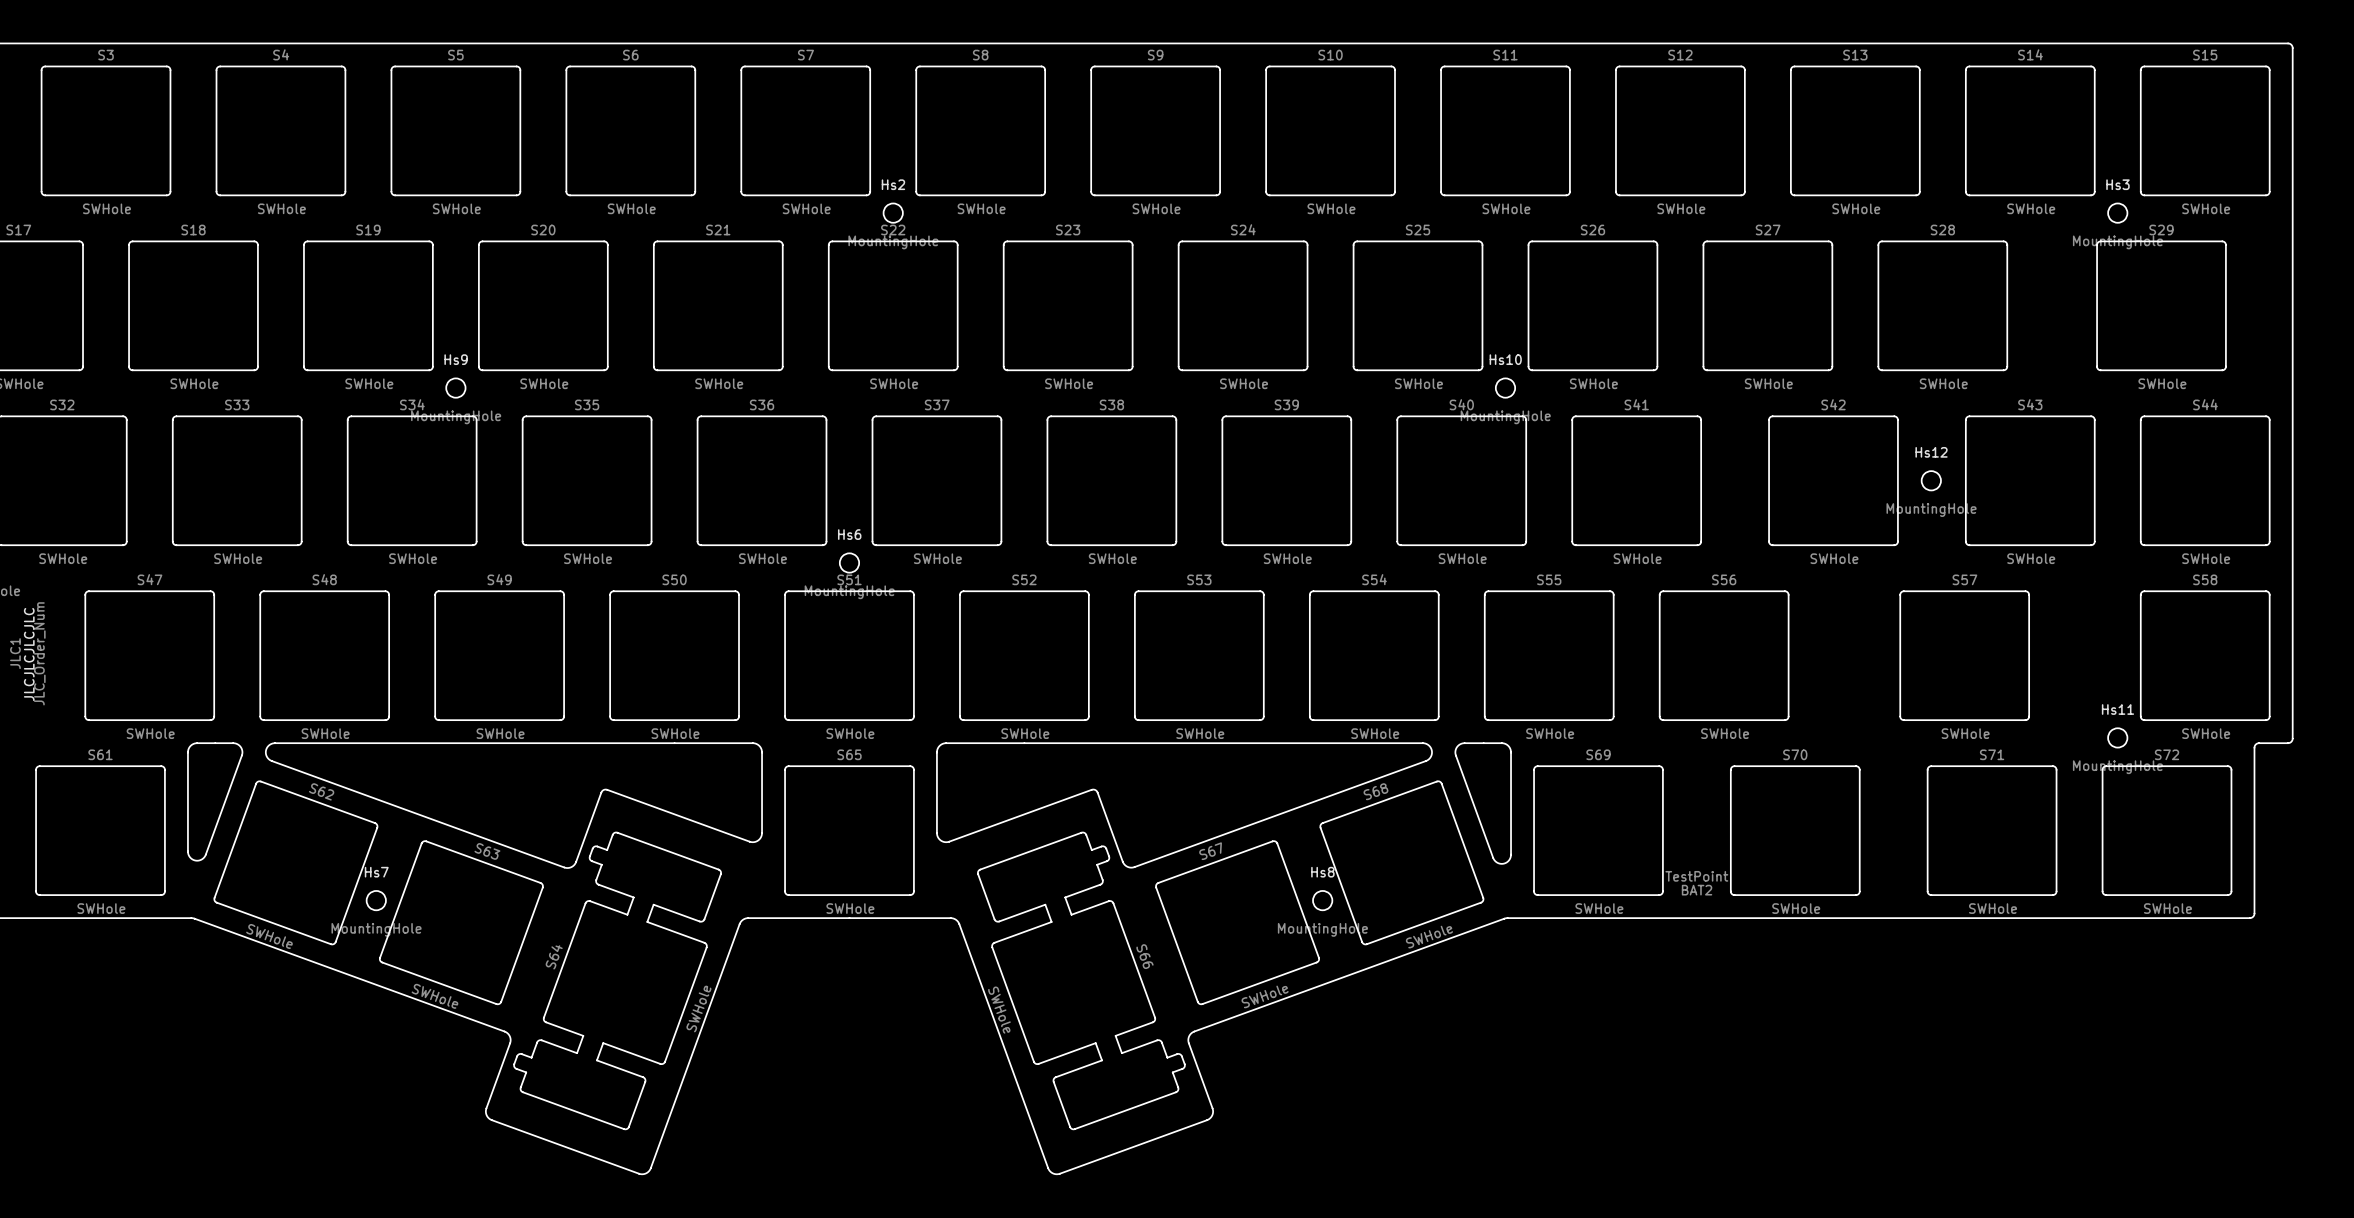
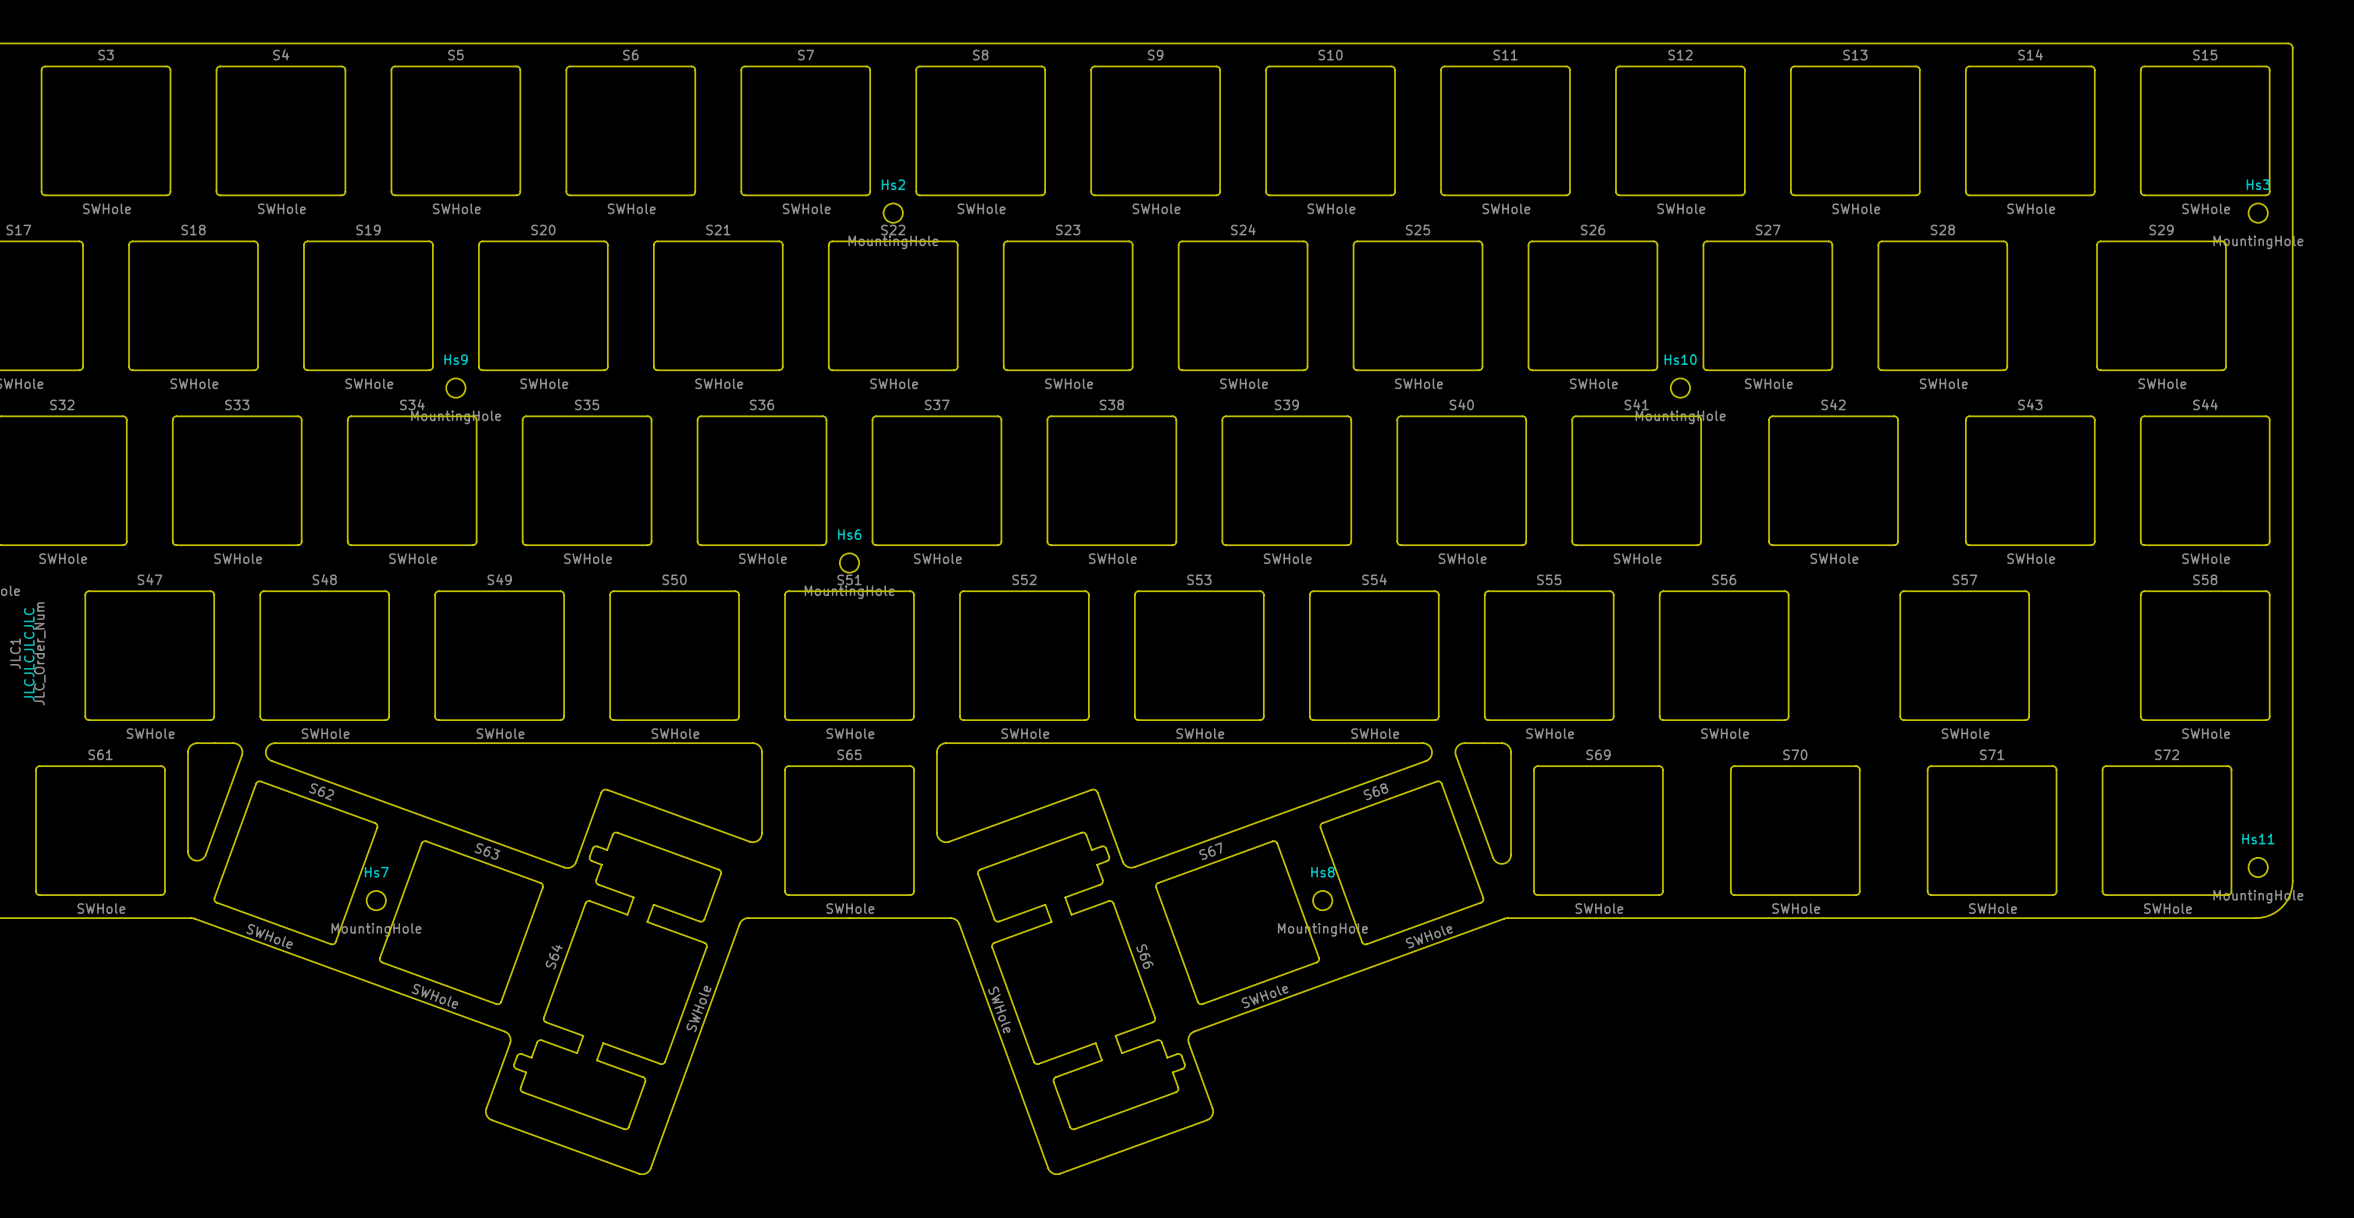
Hs3 position: (2117, 213) -> (2258, 213)
Hs10 position: (1505, 388) -> (1680, 388)
Hs12: MountingHole (1931, 480) -> none
Hs11 position: (2117, 737) -> (2258, 867)
board edge: (2292, 738) (2289, 743) (2258, 743) (2254, 746) (2254, 913) (2249, 918) -> (2292, 738) (2291, 890) (2285, 903) (2274, 913) (2265, 916) (2249, 918)
BAT2: TestPoint (1696, 883) -> none

